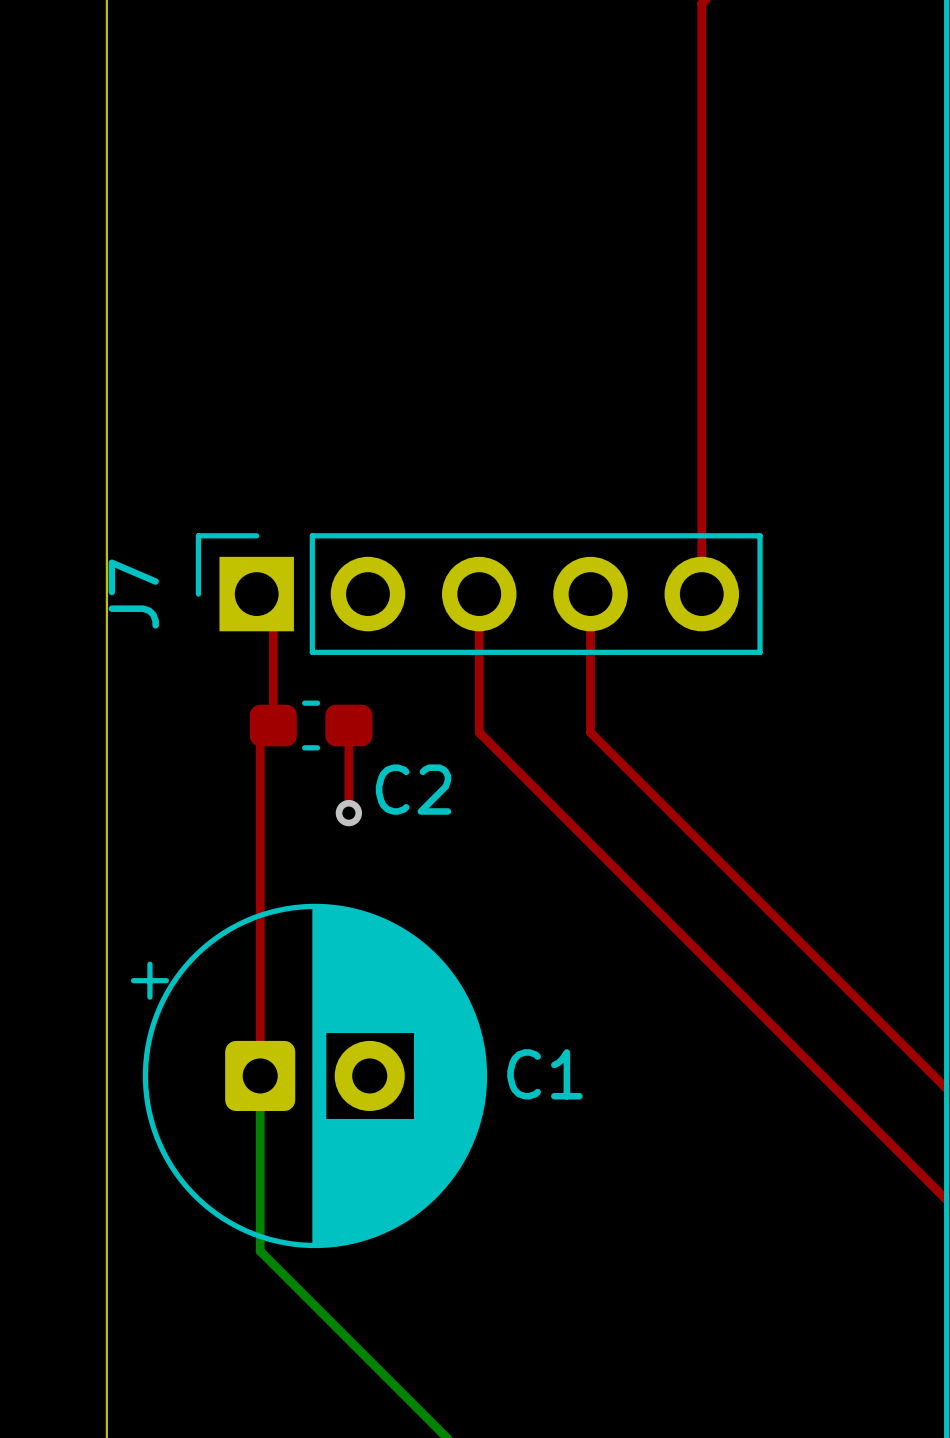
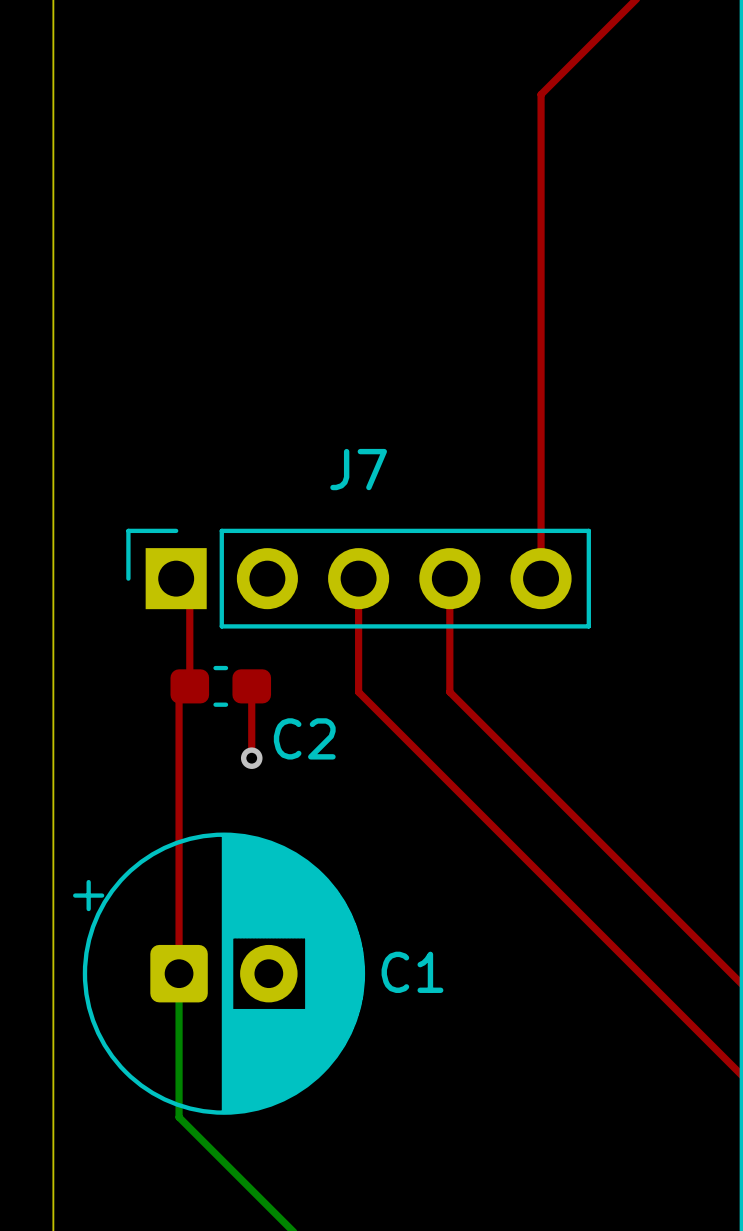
J7 name rotation: 0° (133, 594) -> 90° clockwise (358, 469)
J7 name position: J7 (133, 594) -> J7 (358, 469)

